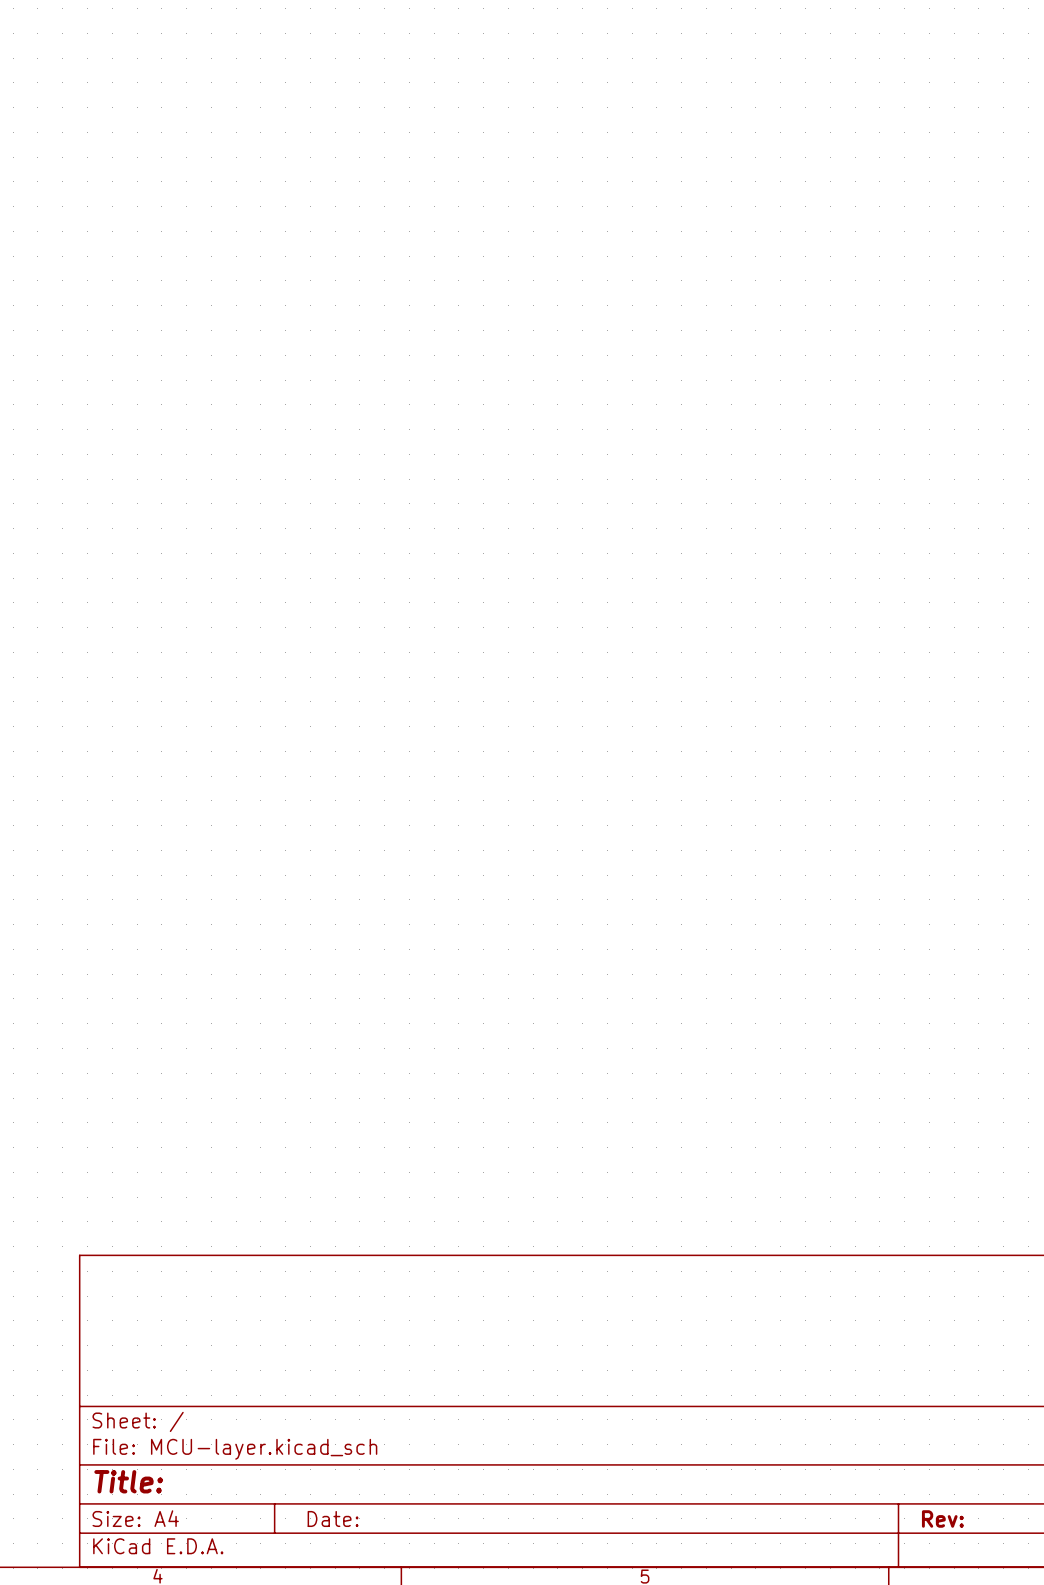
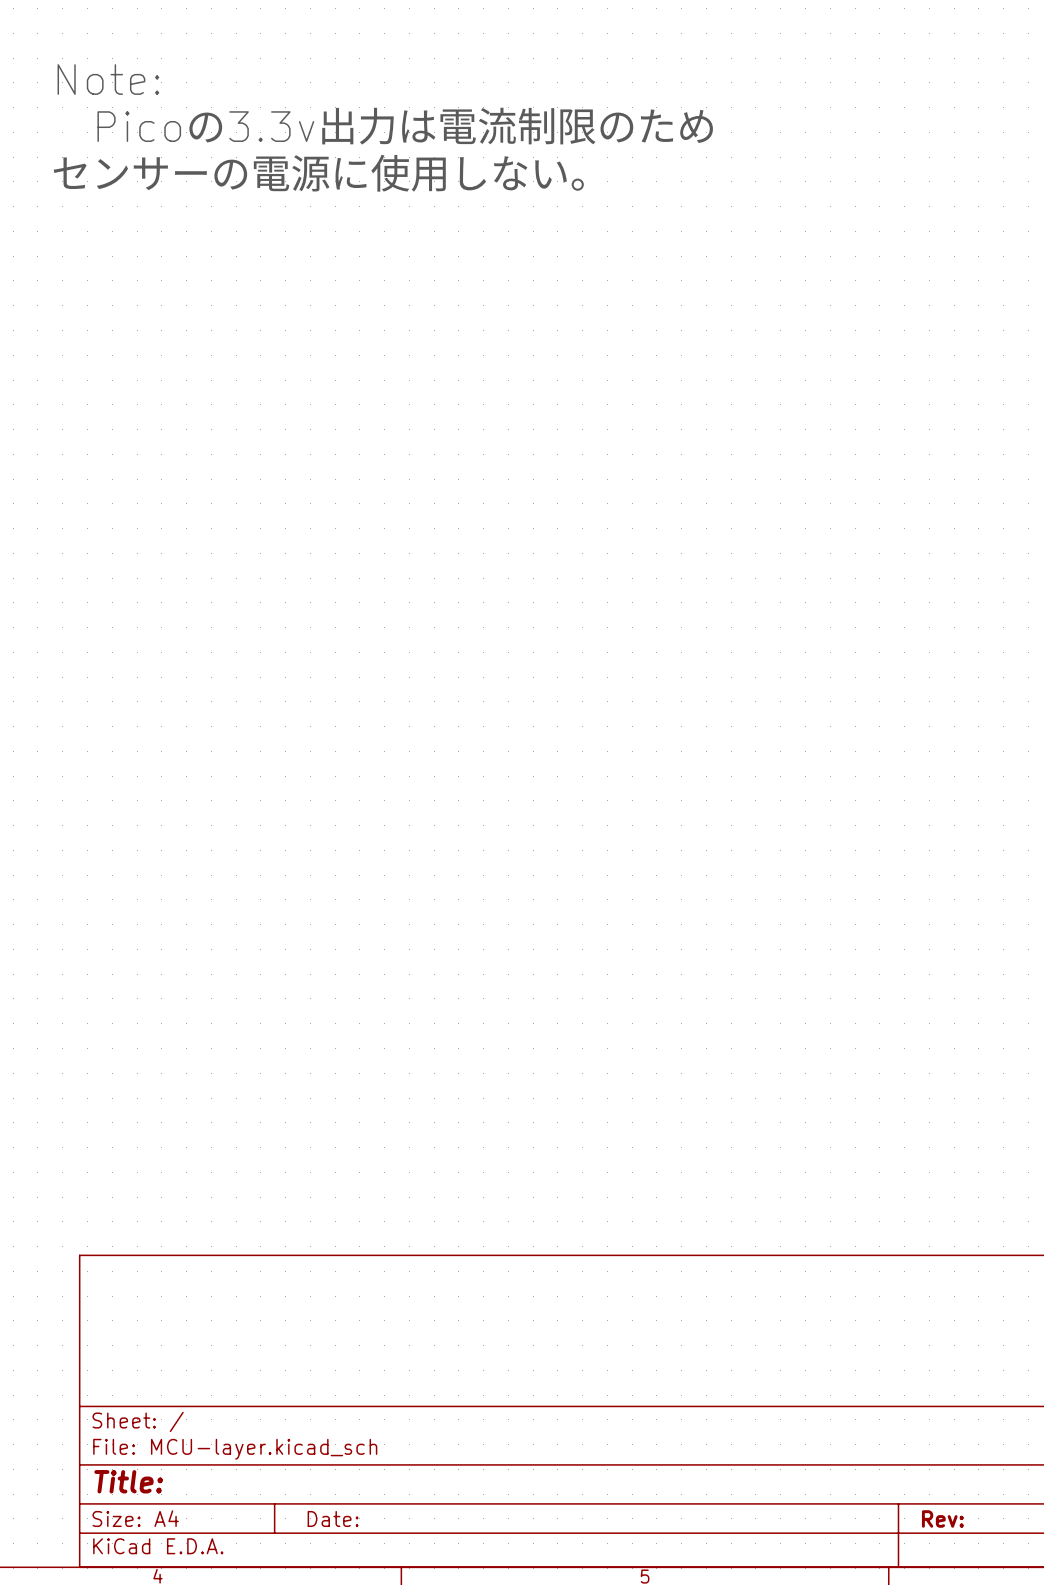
text: none -> Note: (108, 79)
text: none -> Picoの3.3v出力は電流制限のため (405, 126)
text: none -> センサーの電源に使用しない。 (318, 173)

